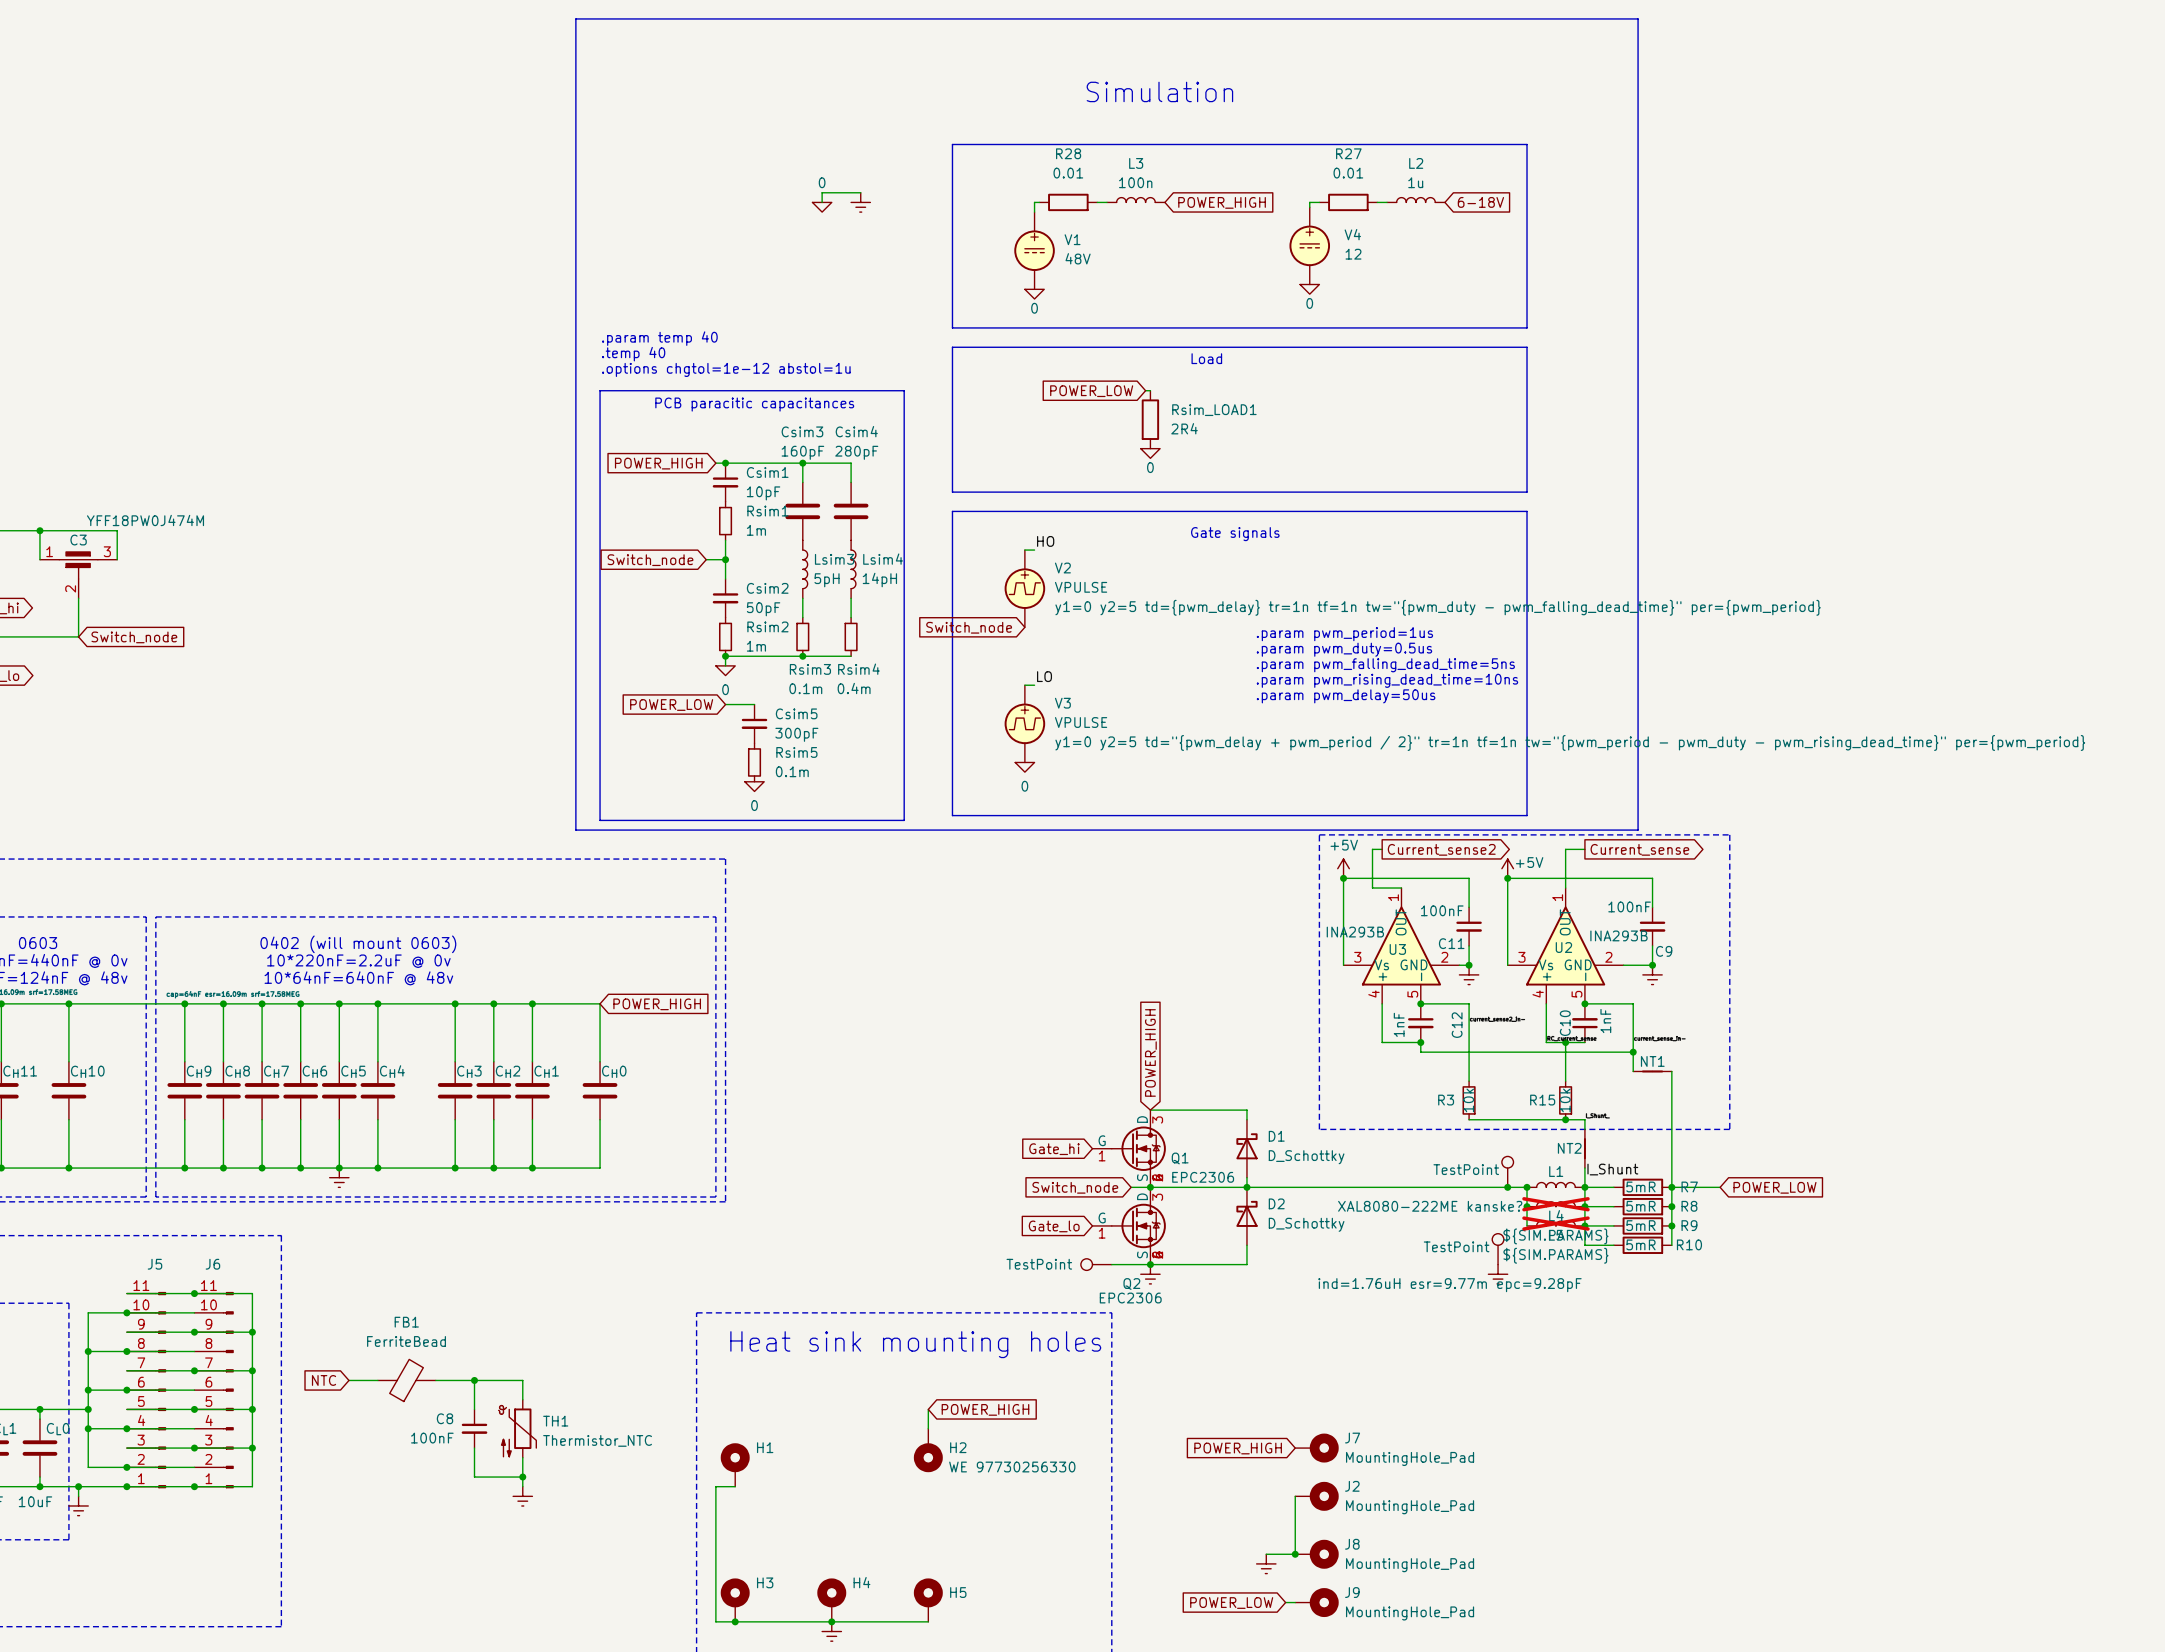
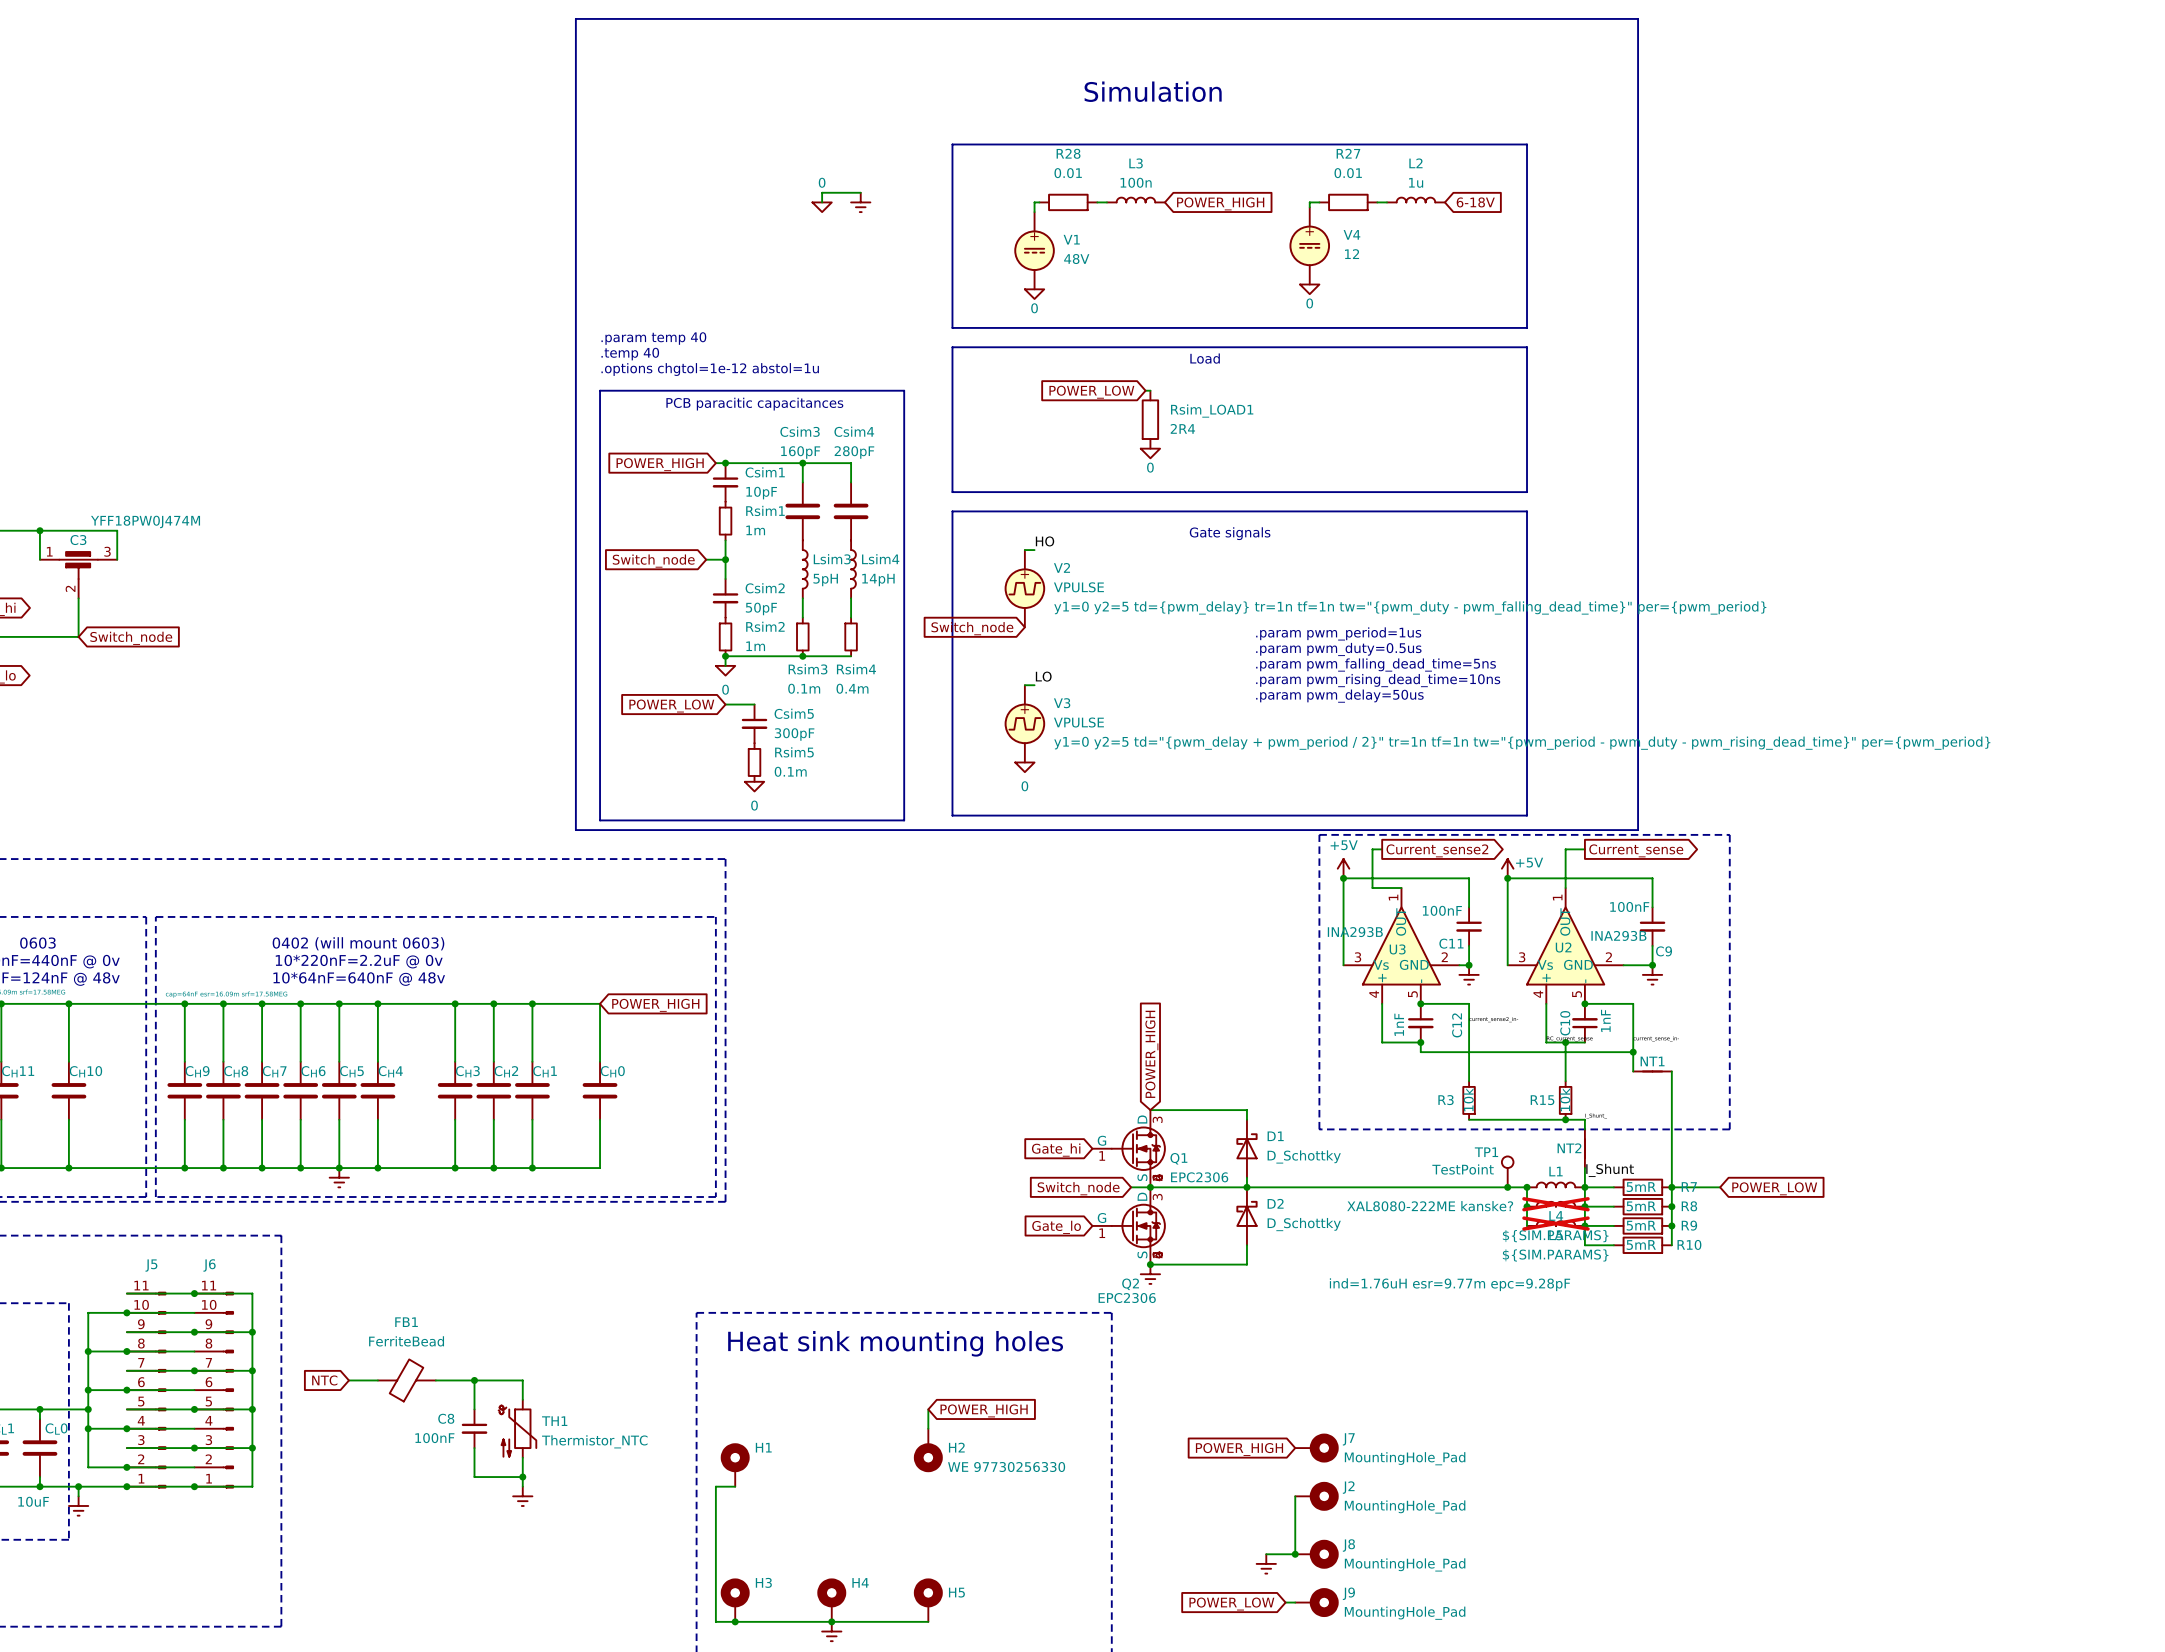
TP1 name: none -> TP1 (1486, 1152)
part: TestPoint (1498, 1249) -> none
part: TestPoint (1096, 1264) -> none
wire: (1111, 1264) (1150, 1264) -> none
power symbol: (1498, 1274) -> none

